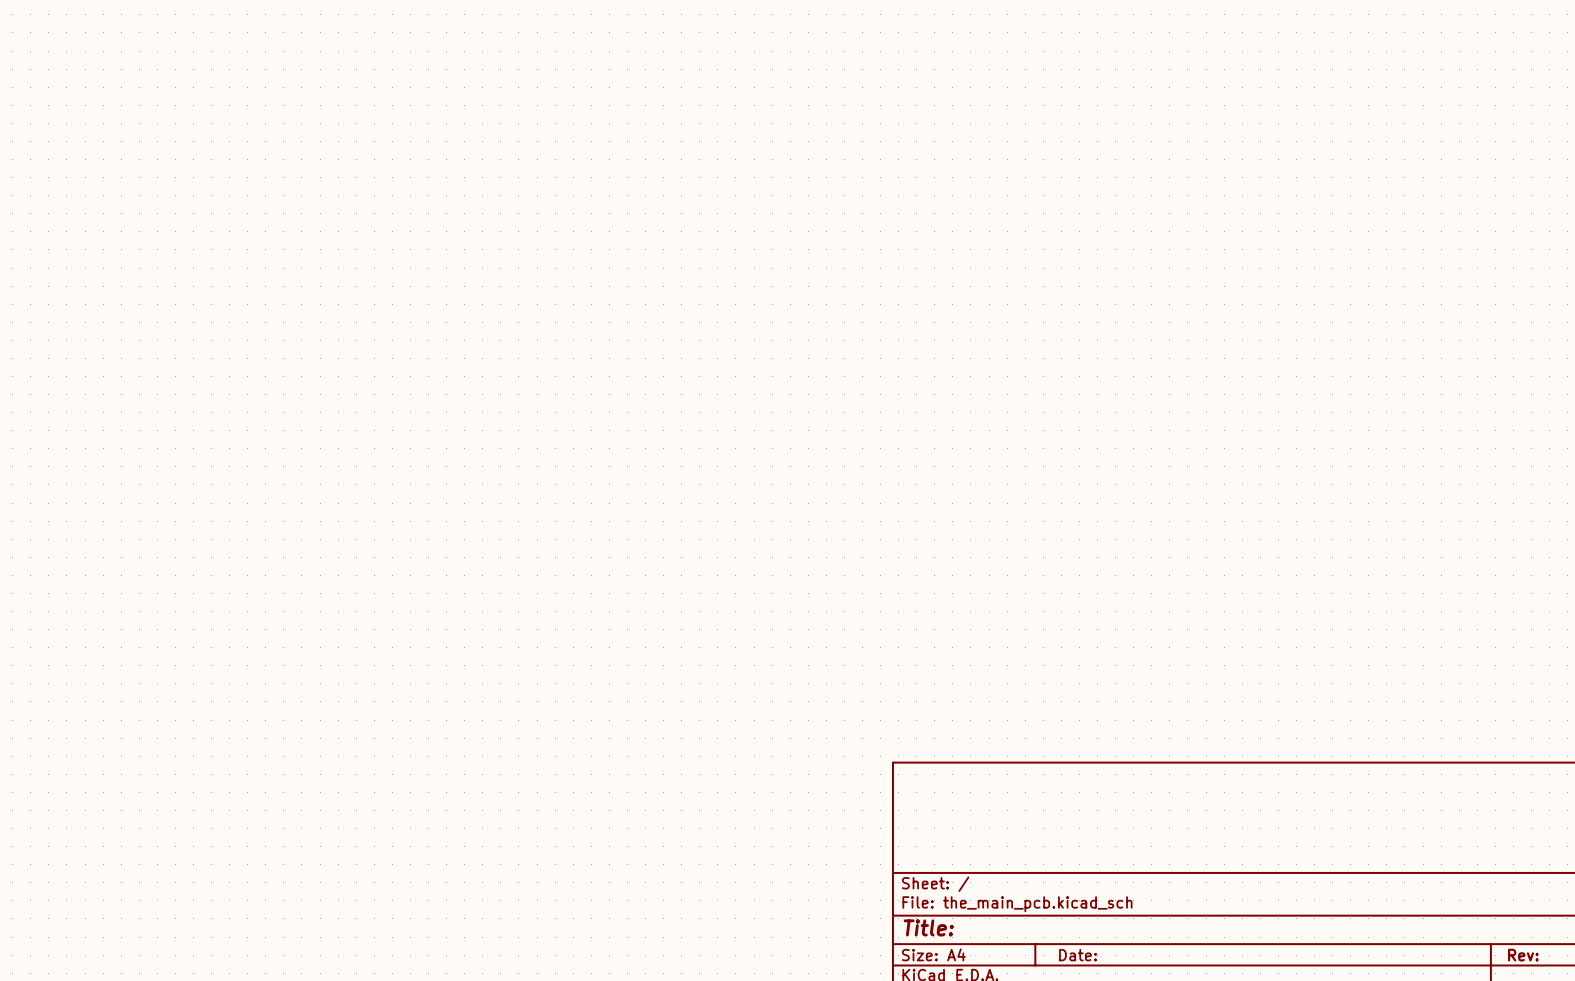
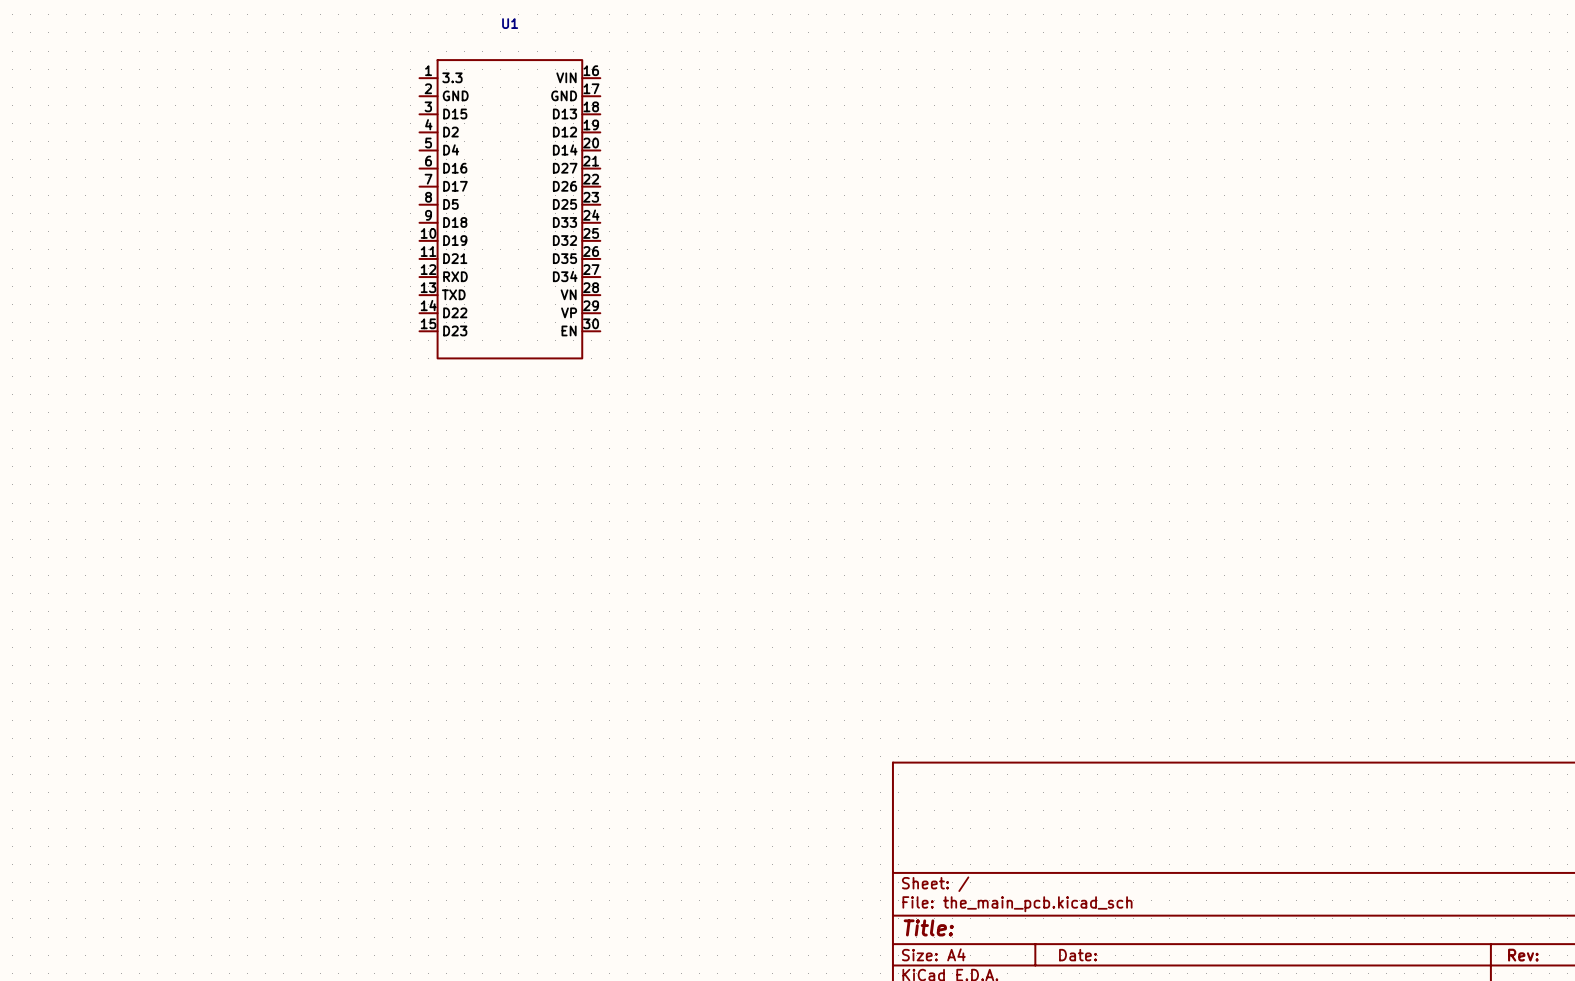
U1: none -> (509, 209)

